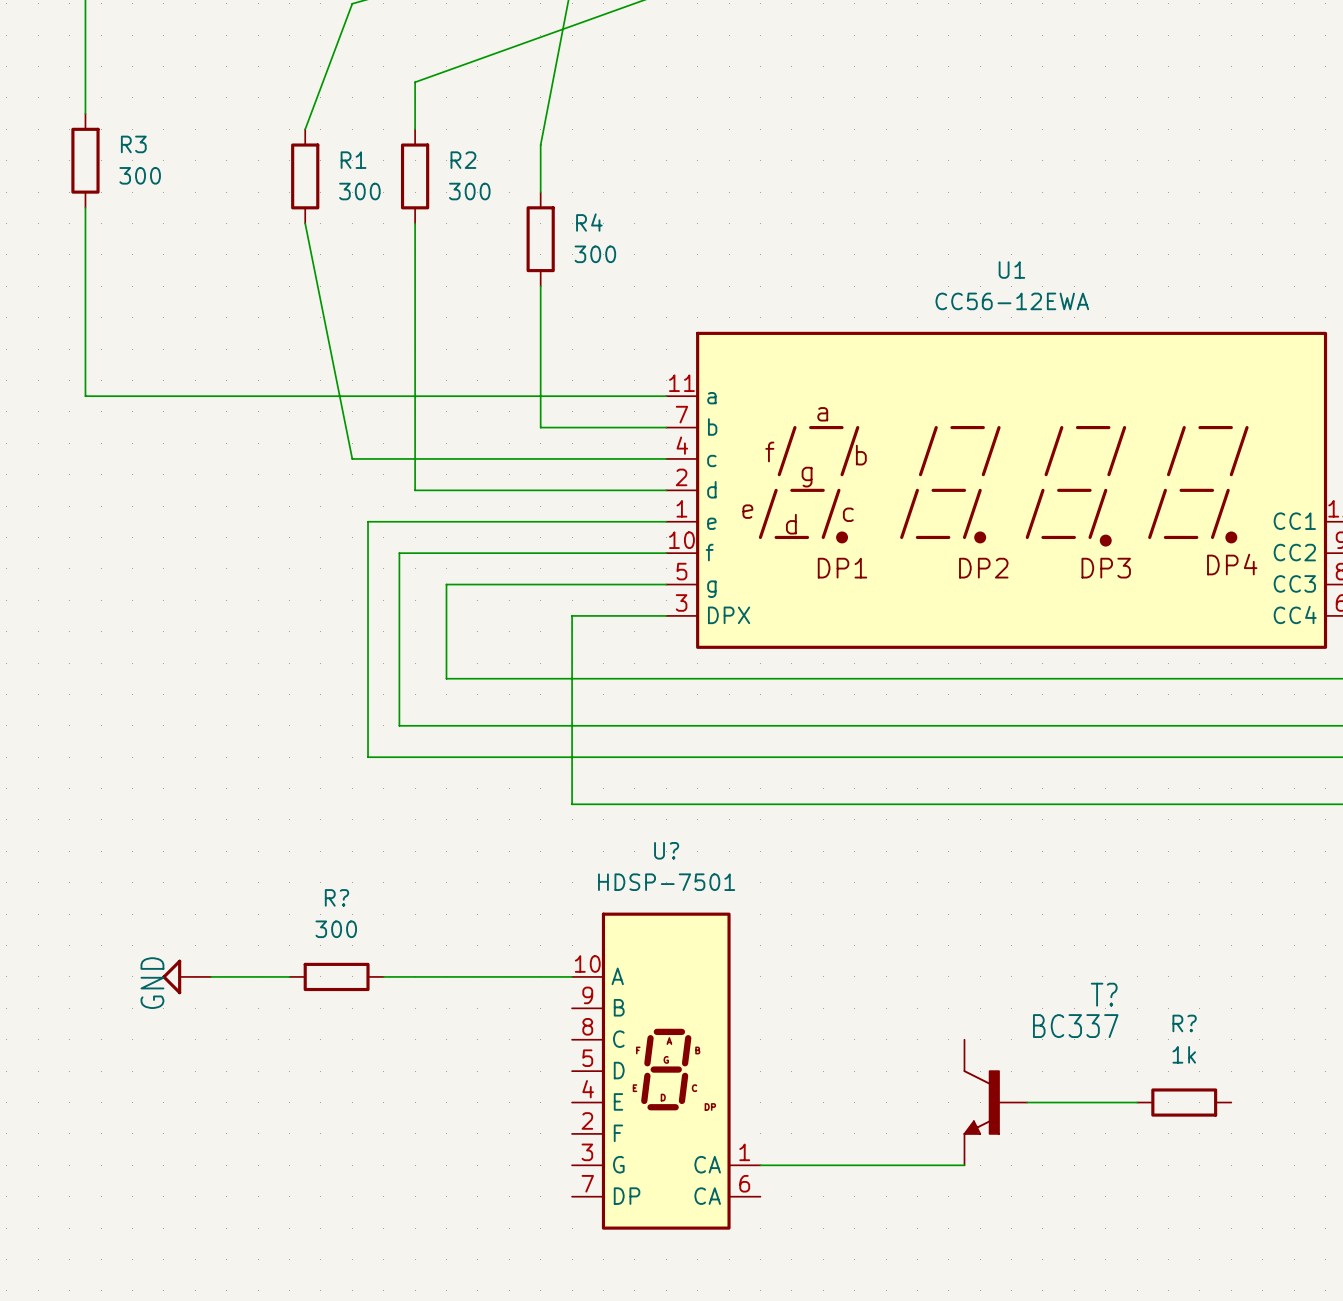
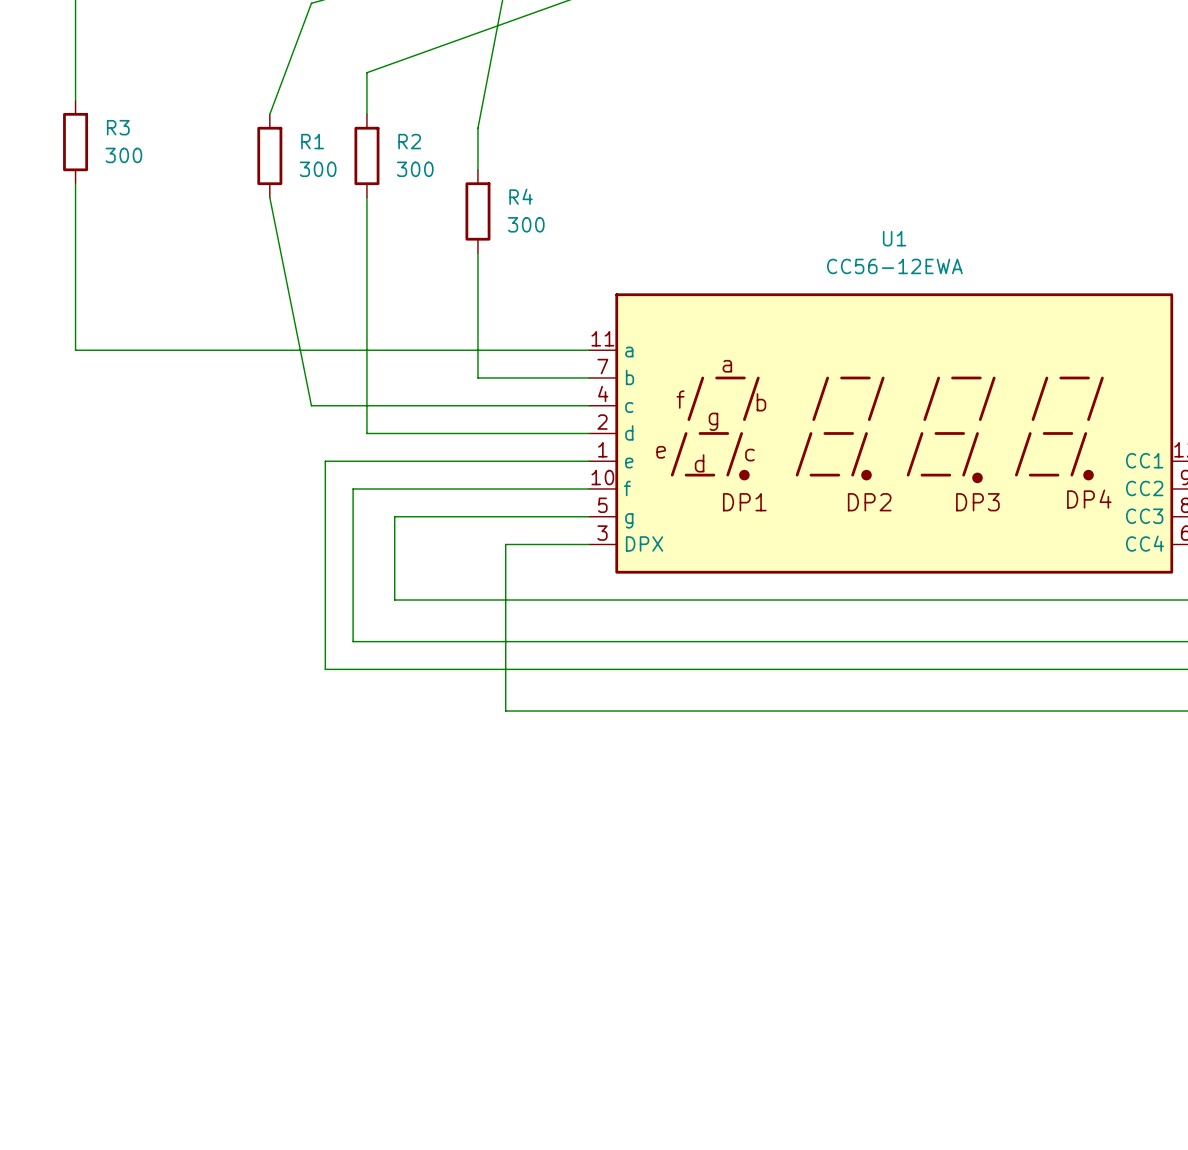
power symbol: GND (186, 976) -> none
wire: (211, 976) (289, 976) -> none
R?: 300 (336, 976) -> none
wire: (383, 976) (572, 976) -> none
U?: HDSP-7501 (666, 1071) -> none
T?: BC337 (995, 1102) -> none
wire: (1027, 1102) (1137, 1102) -> none
R?: 1k (1184, 1102) -> none
wire: (760, 1165) (964, 1165) -> none

